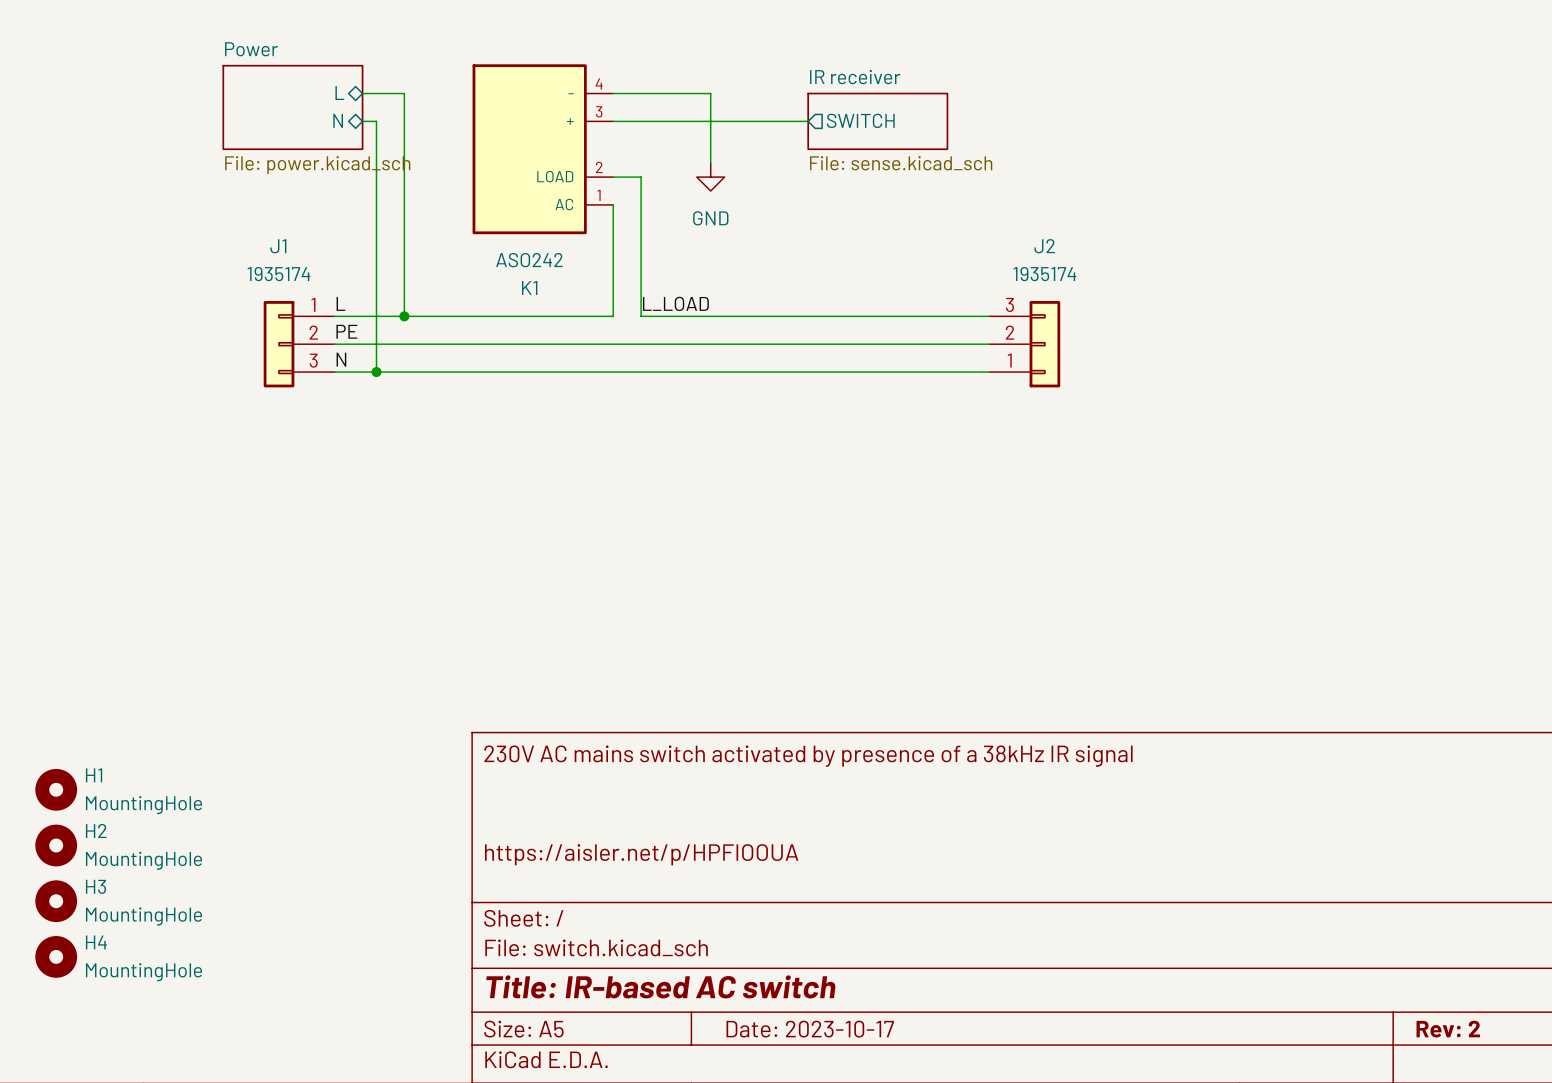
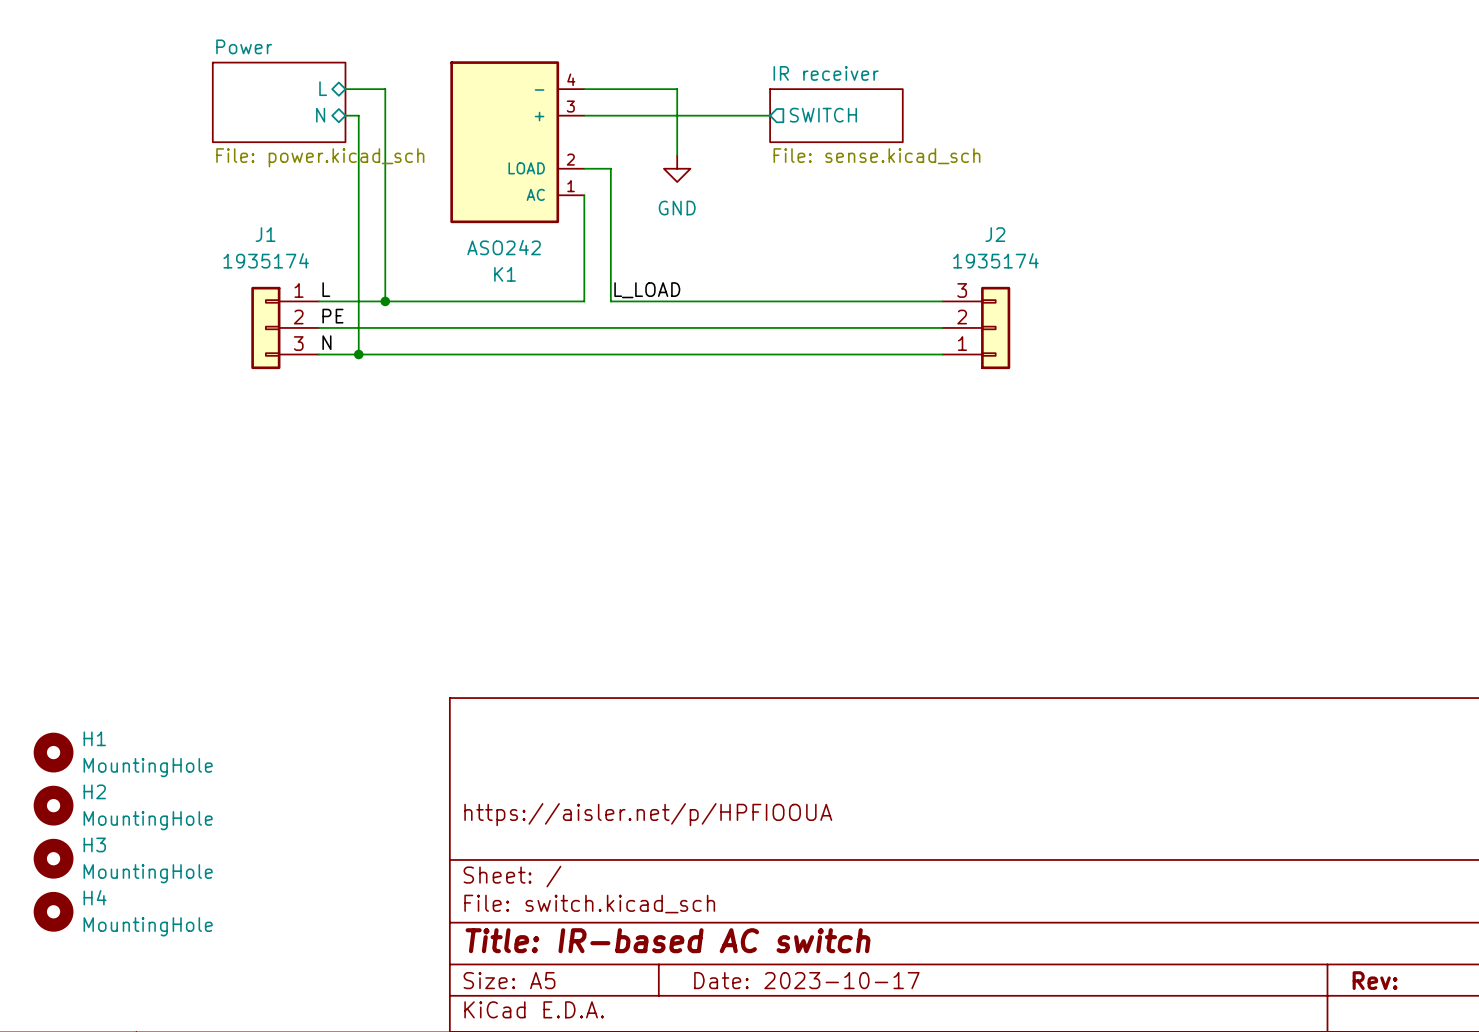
title block: 230V AC mains switch activated by presence of a 38kHz IR signal (808, 756) -> none
title block: Rev: 2 (1448, 1029) -> Rev: (1375, 980)

